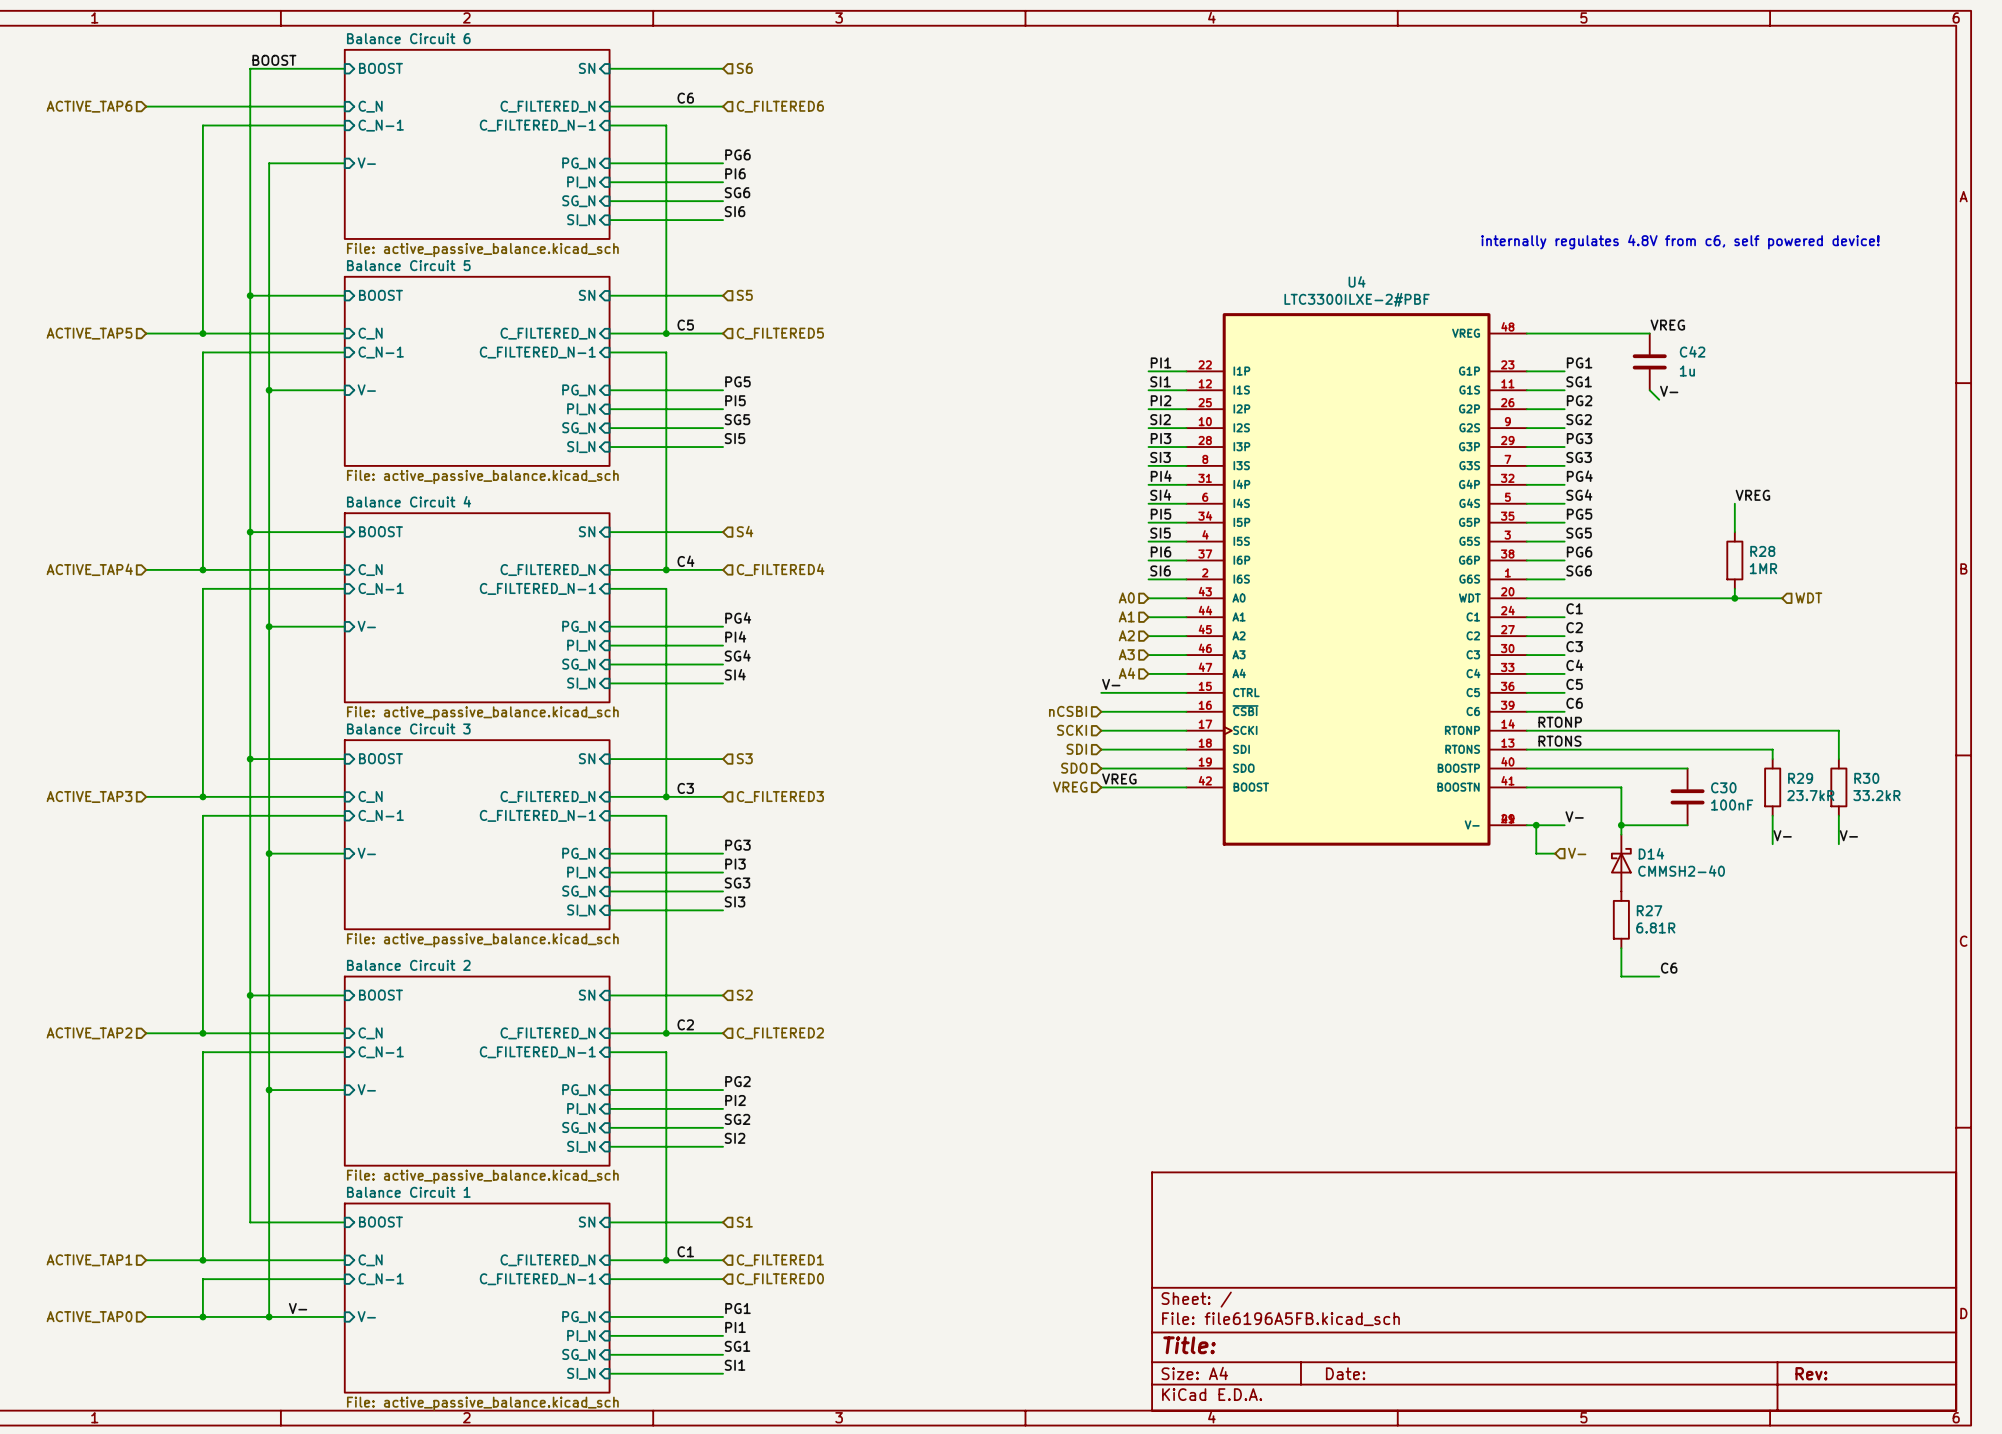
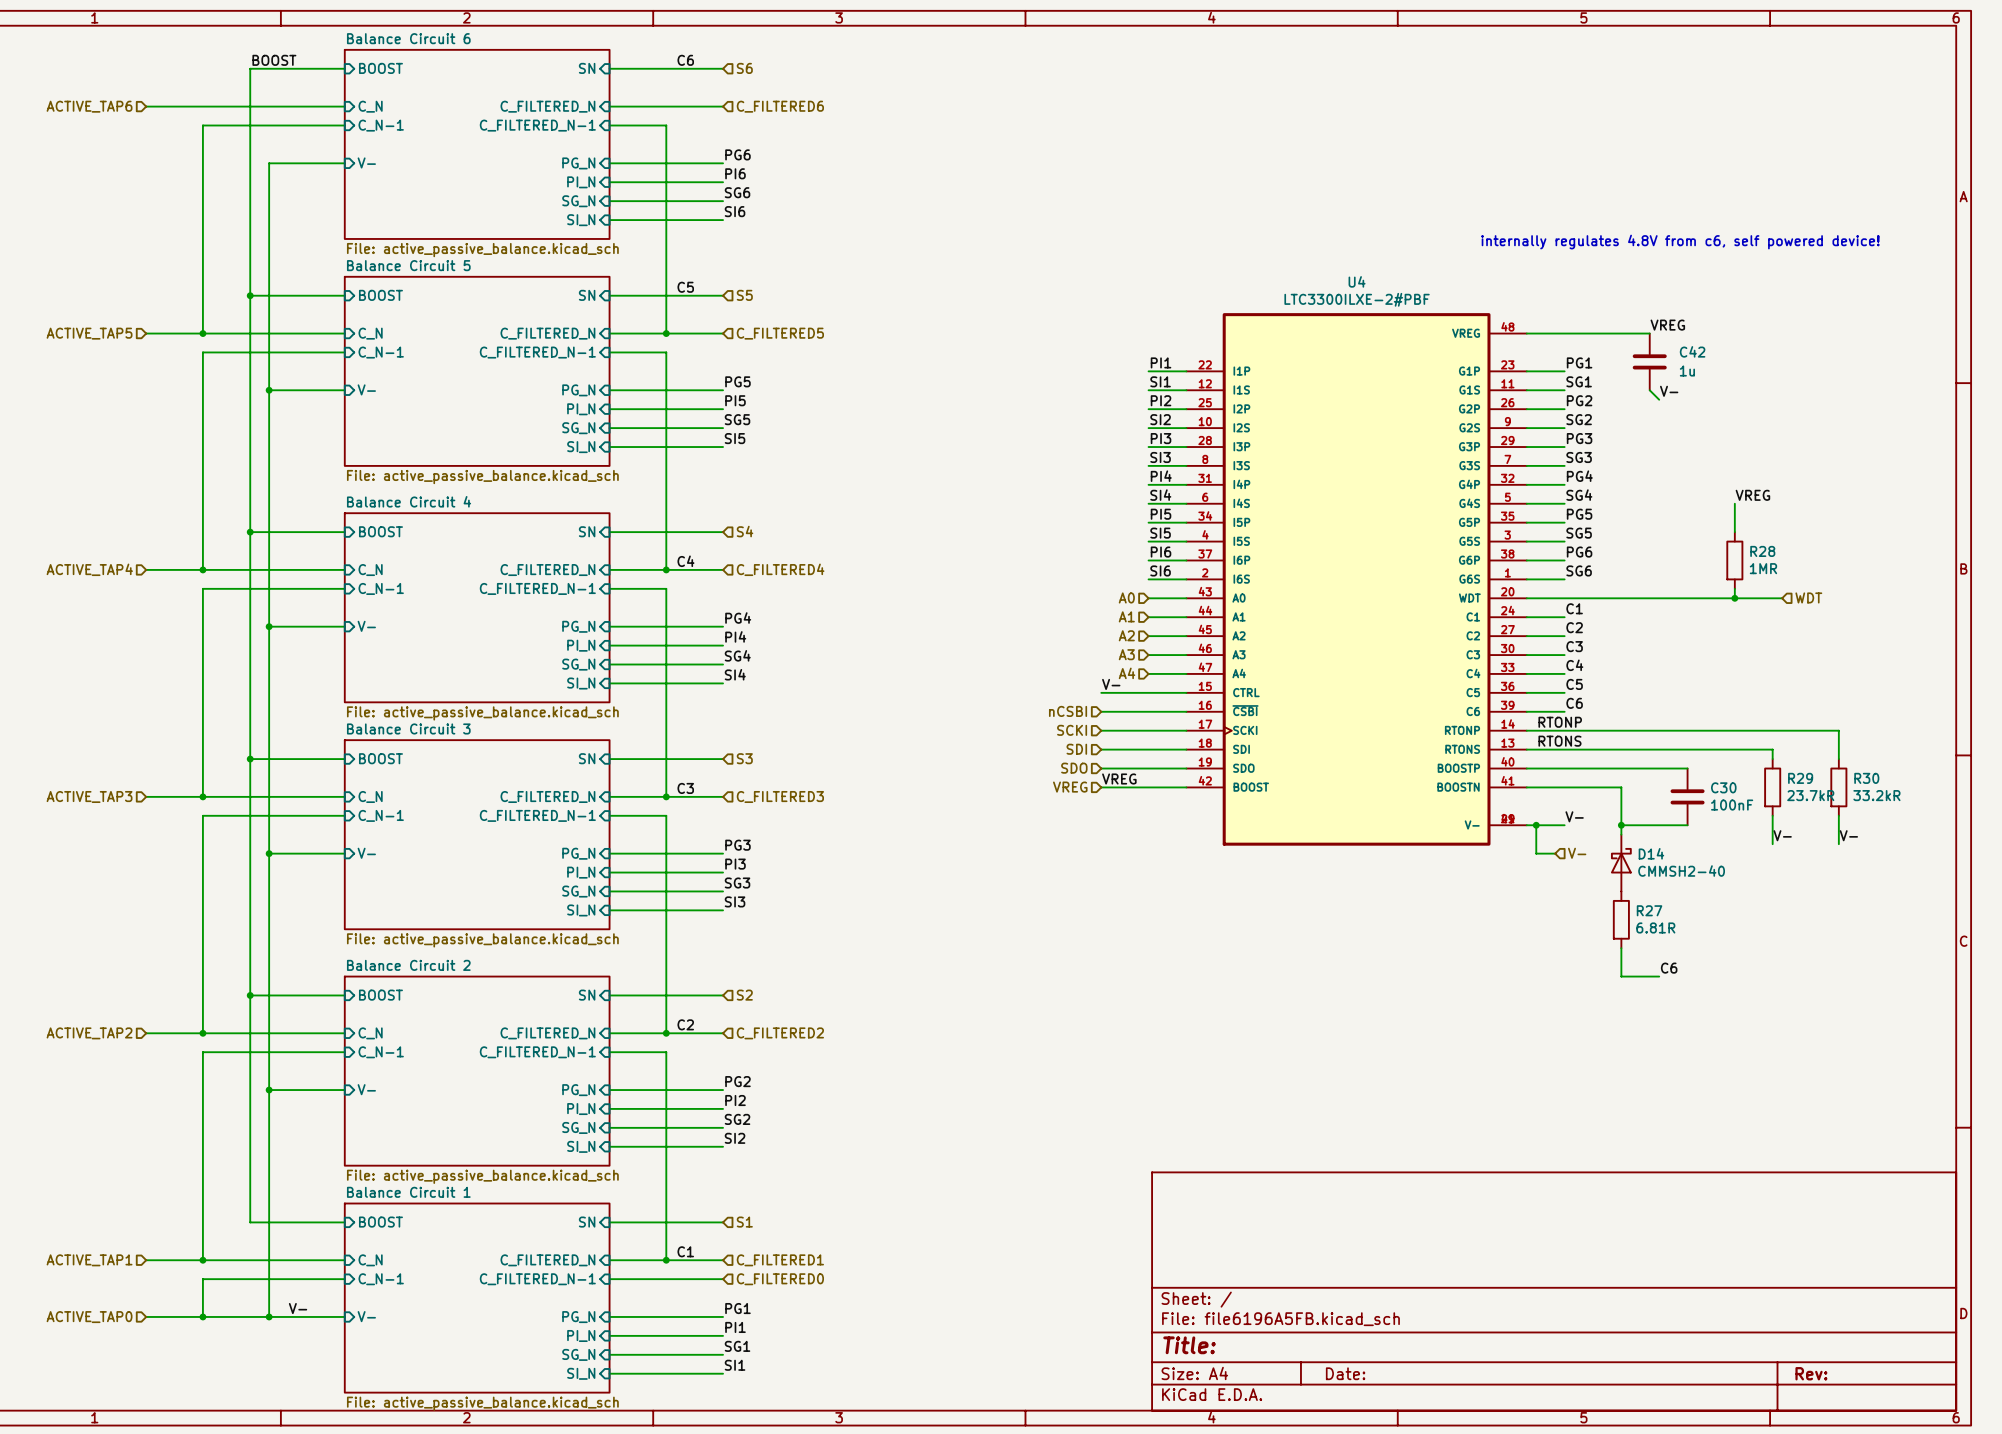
label position: C6 (685, 98) -> C6 (685, 60)
label position: C5 (685, 325) -> C5 (685, 287)

